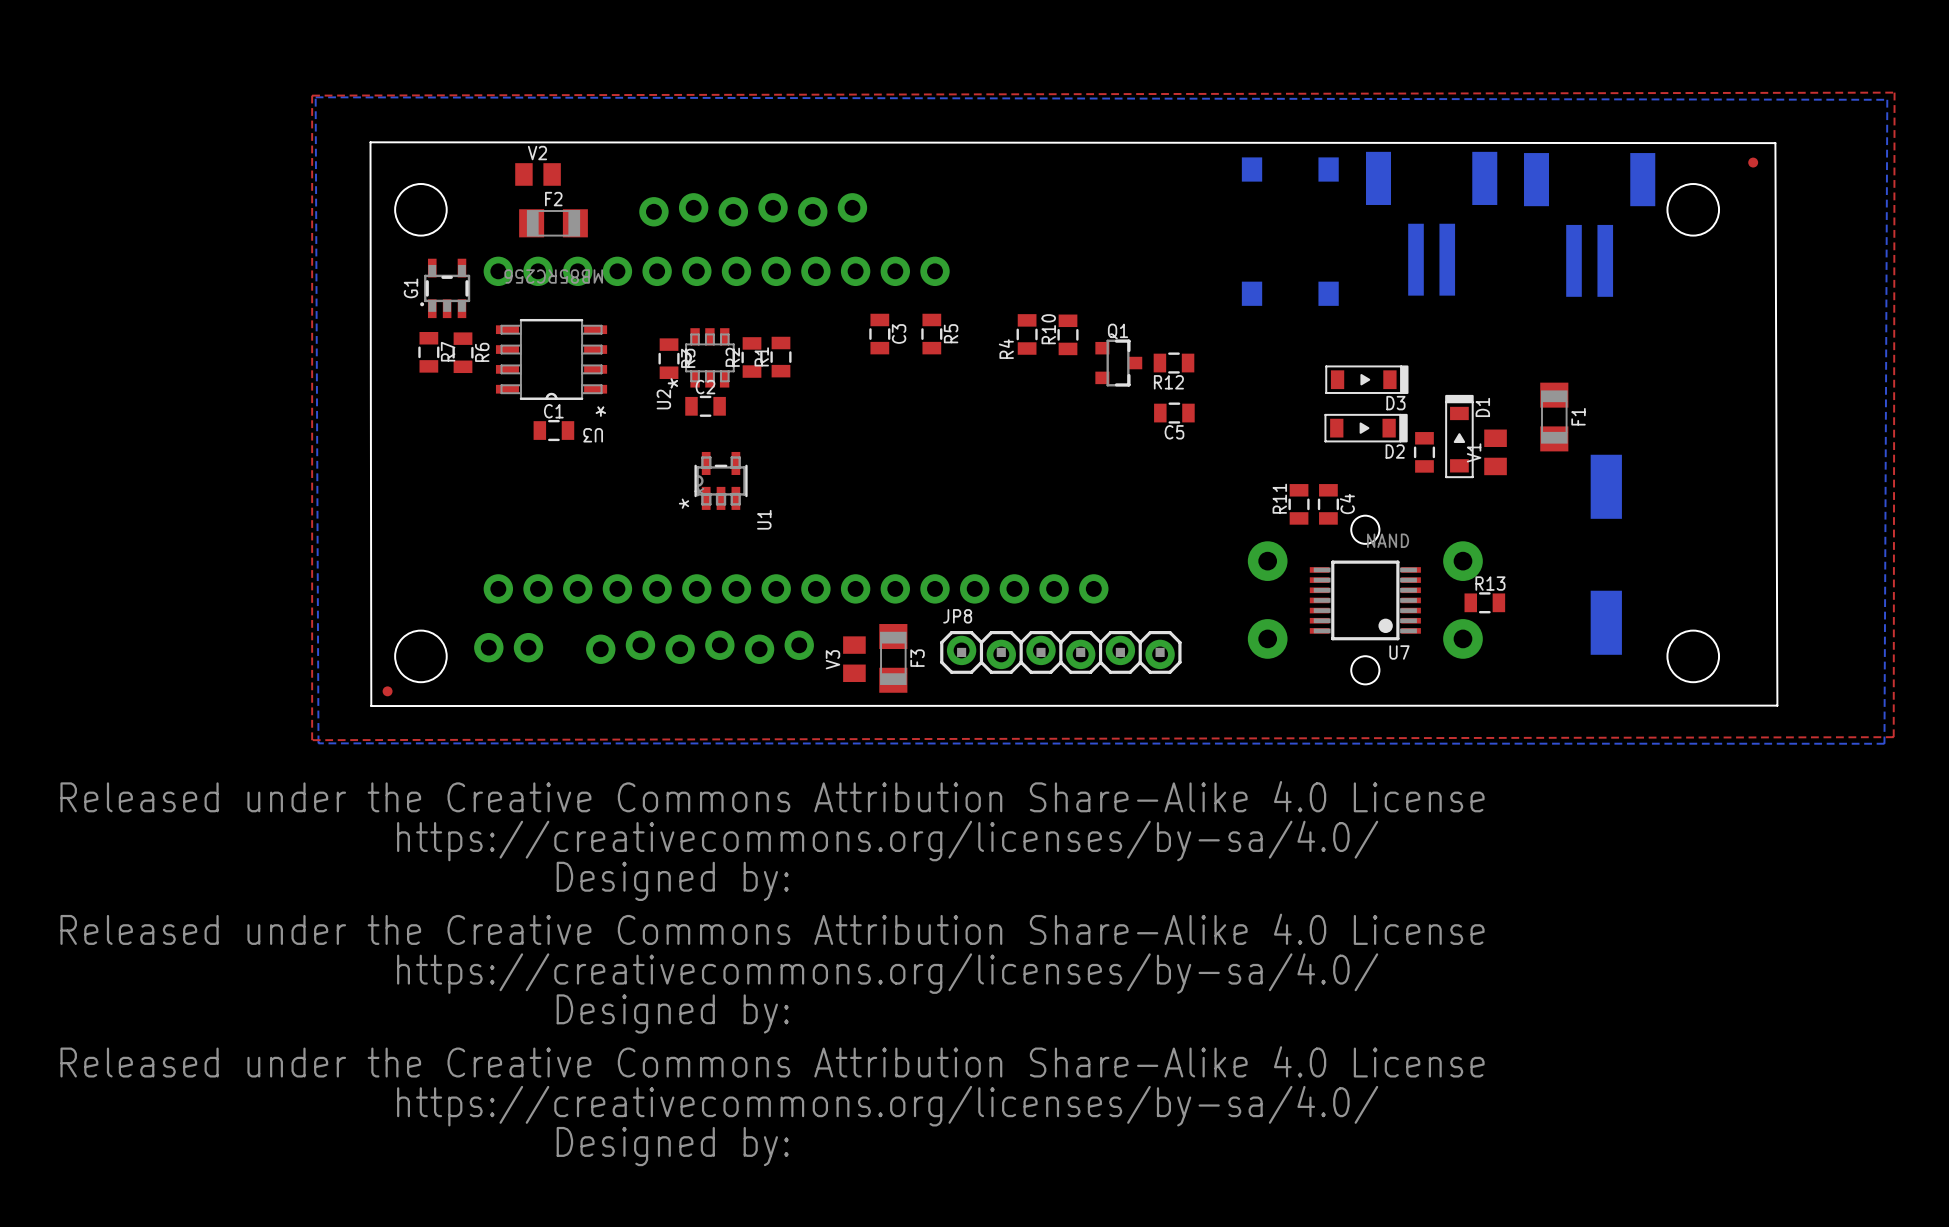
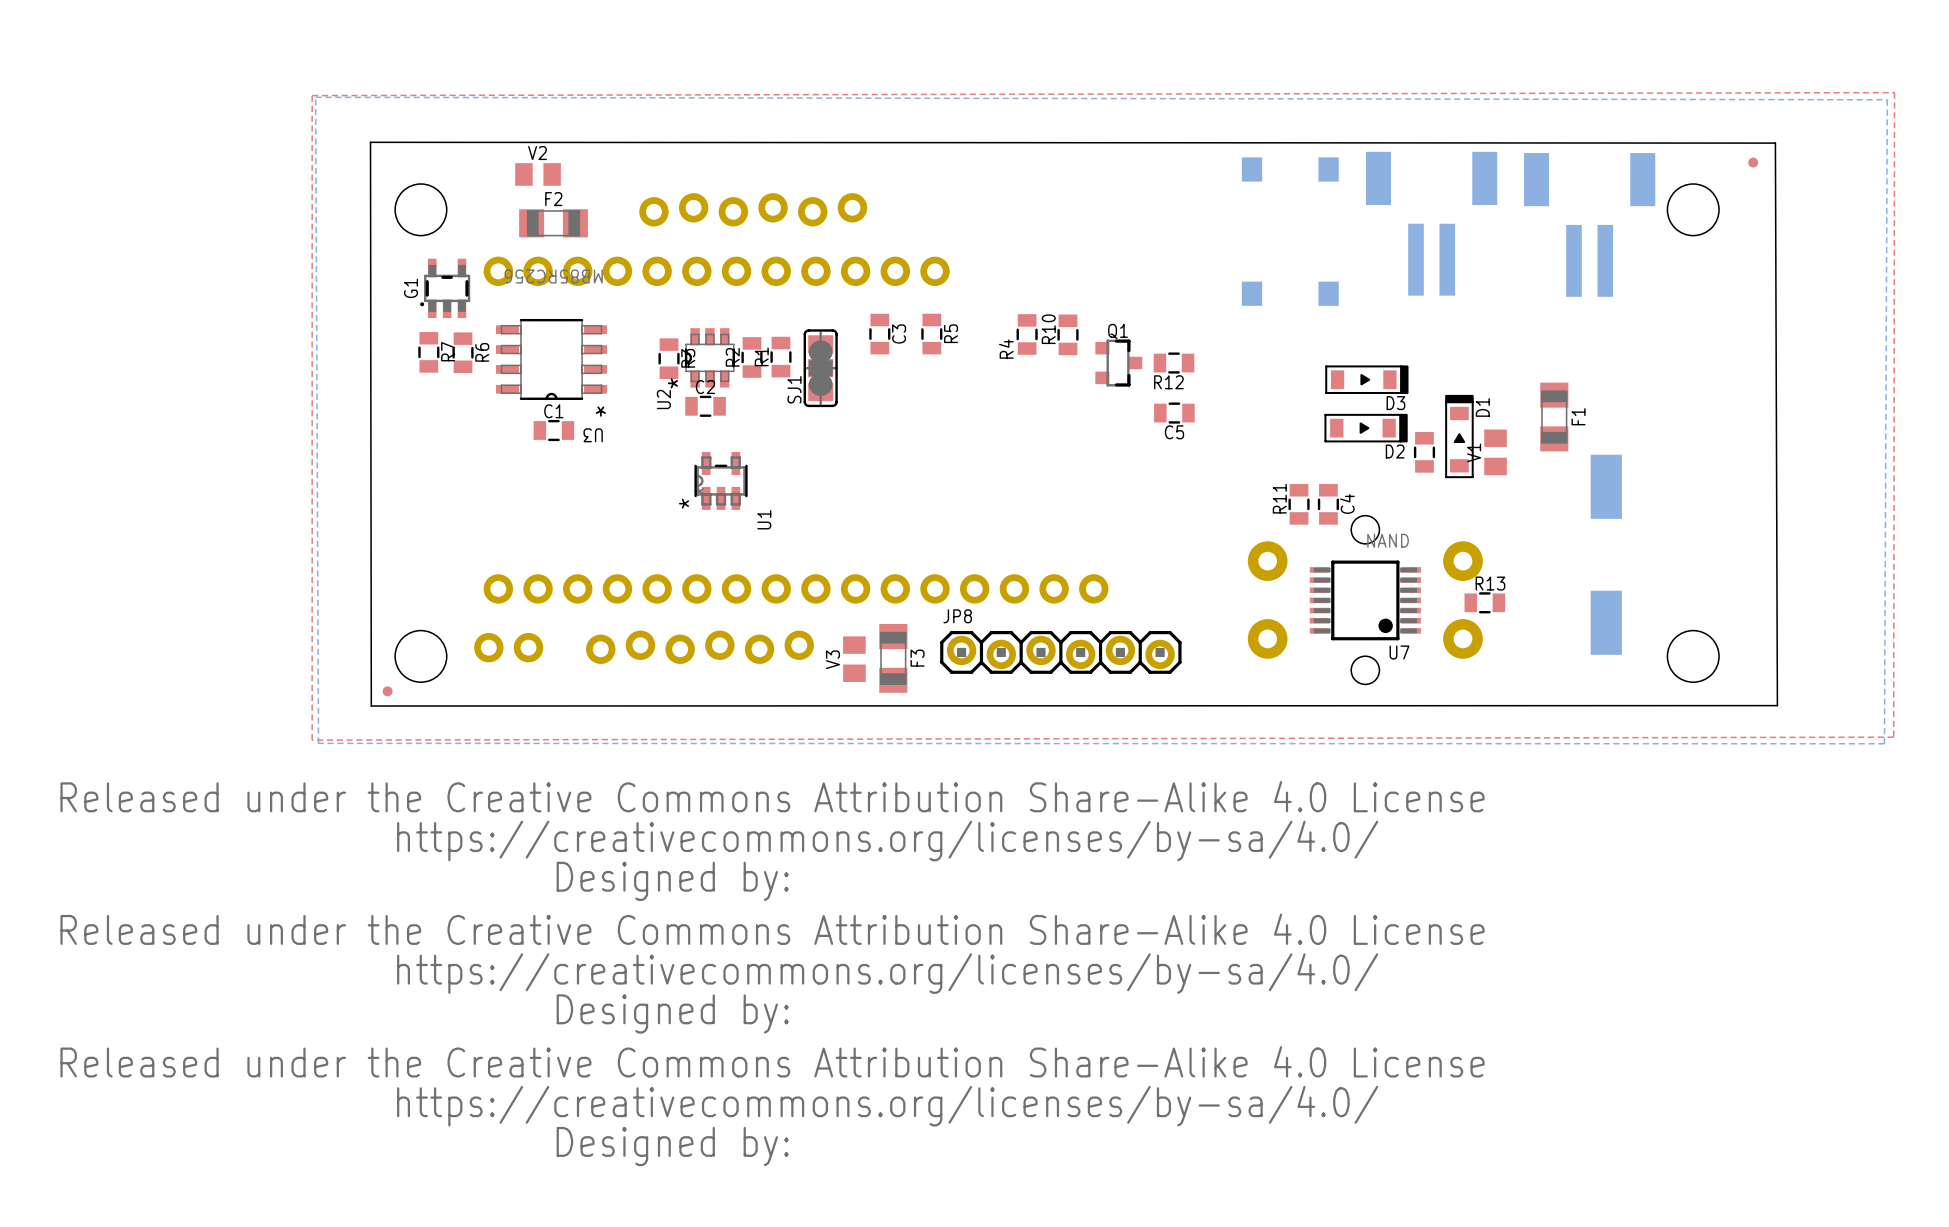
SJ1: none -> (820, 368)

